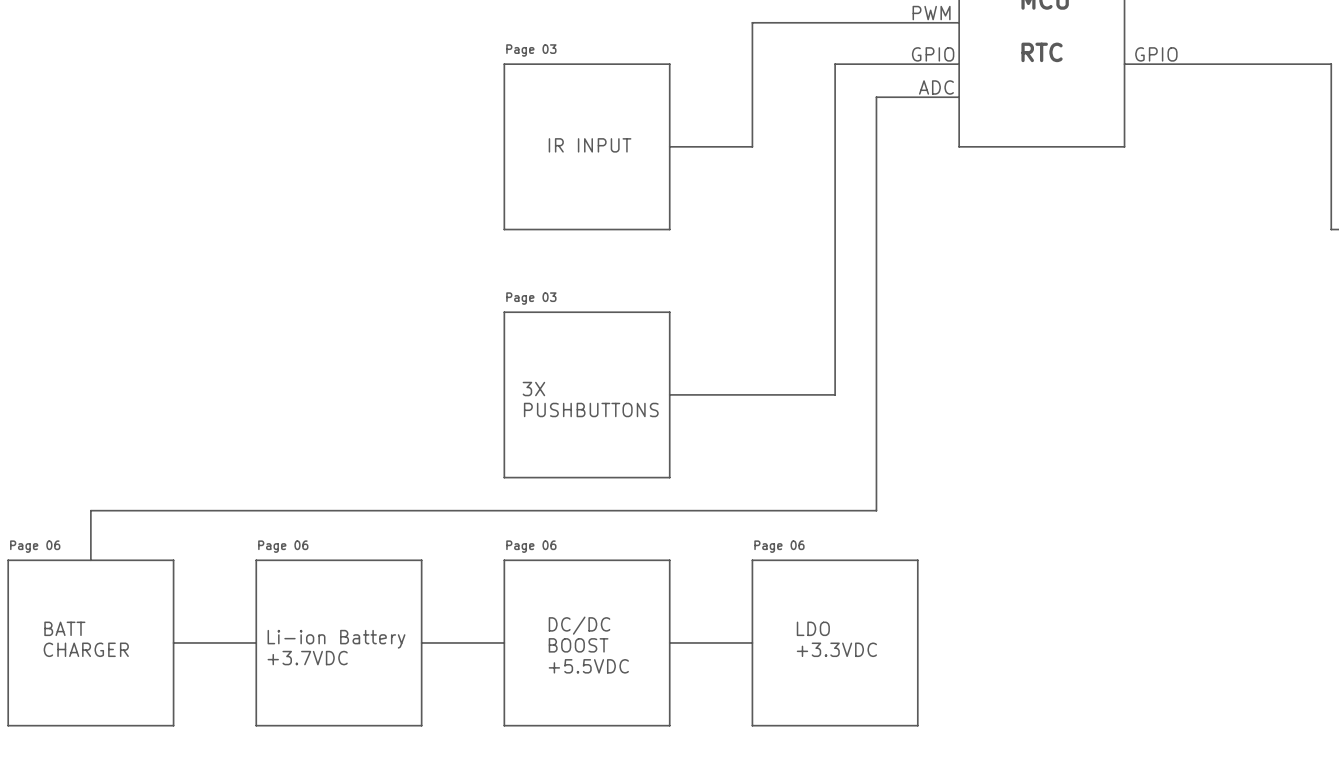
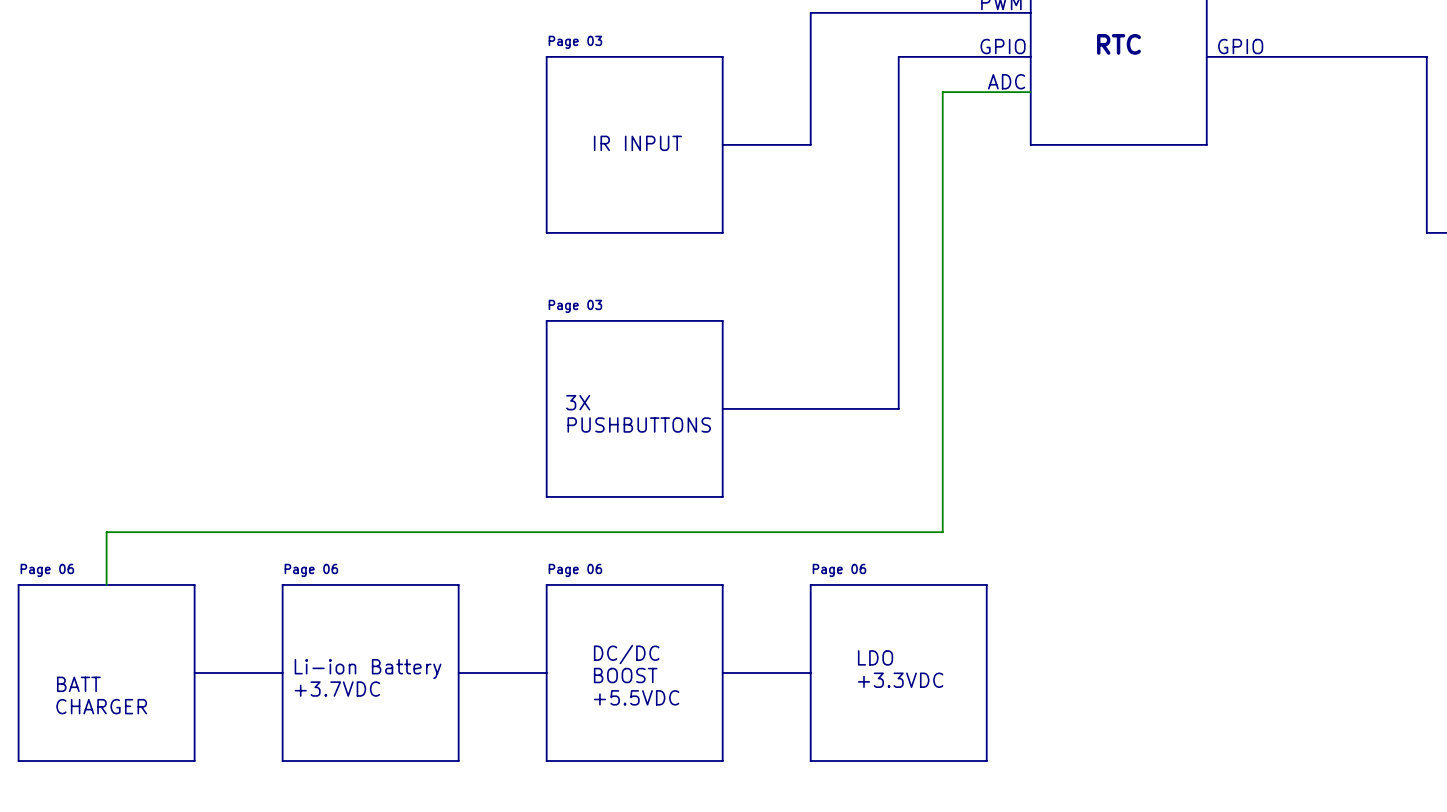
line: (959, 97) (876, 97) (876, 510) (90, 510) (90, 560) -> none
text position: BATT (64, 628) -> BATT (78, 684)
text position: CHARGER (86, 649) -> CHARGER (101, 706)

